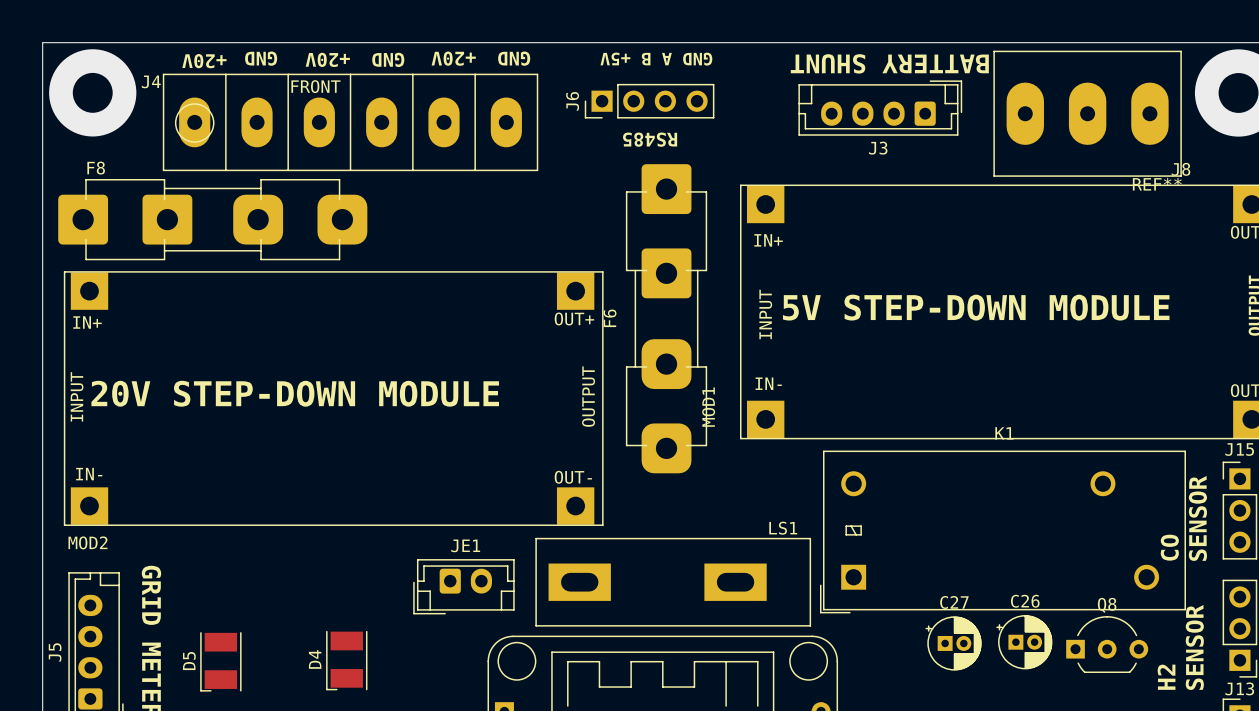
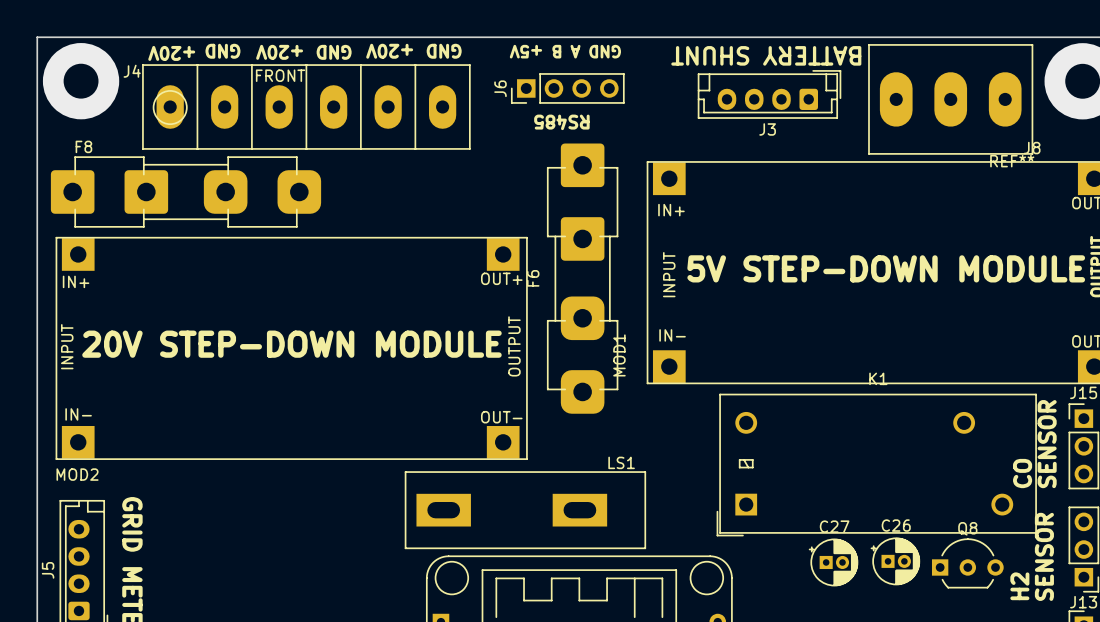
LS1 position: (673, 582) -> (525, 510)
JE1: (463, 586) -> none
D4: (346, 660) -> none
D5: (220, 661) -> none

